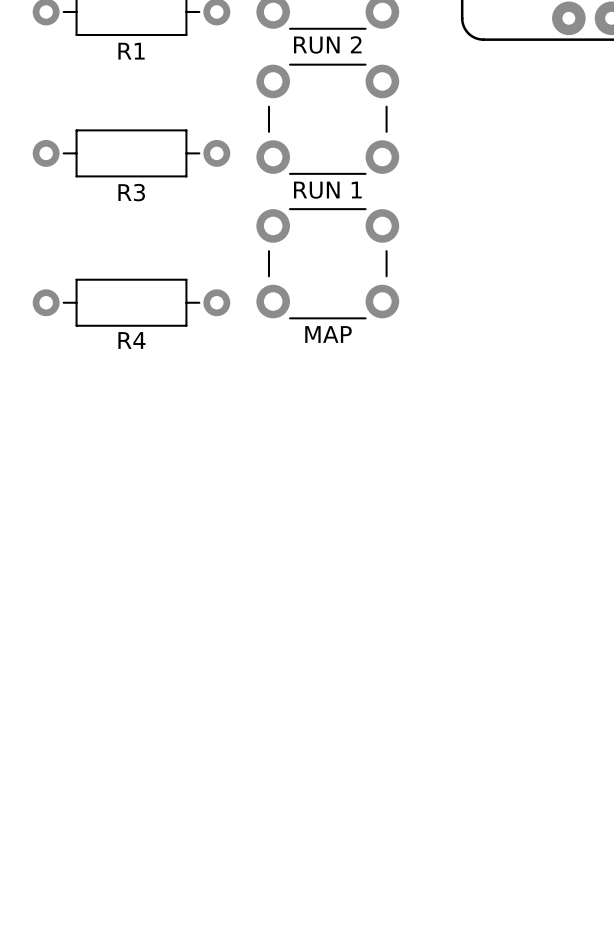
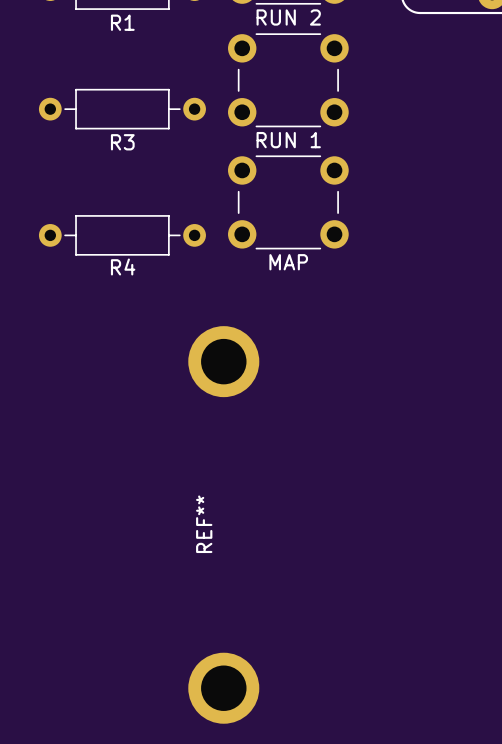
REF**: none -> (223, 524)

